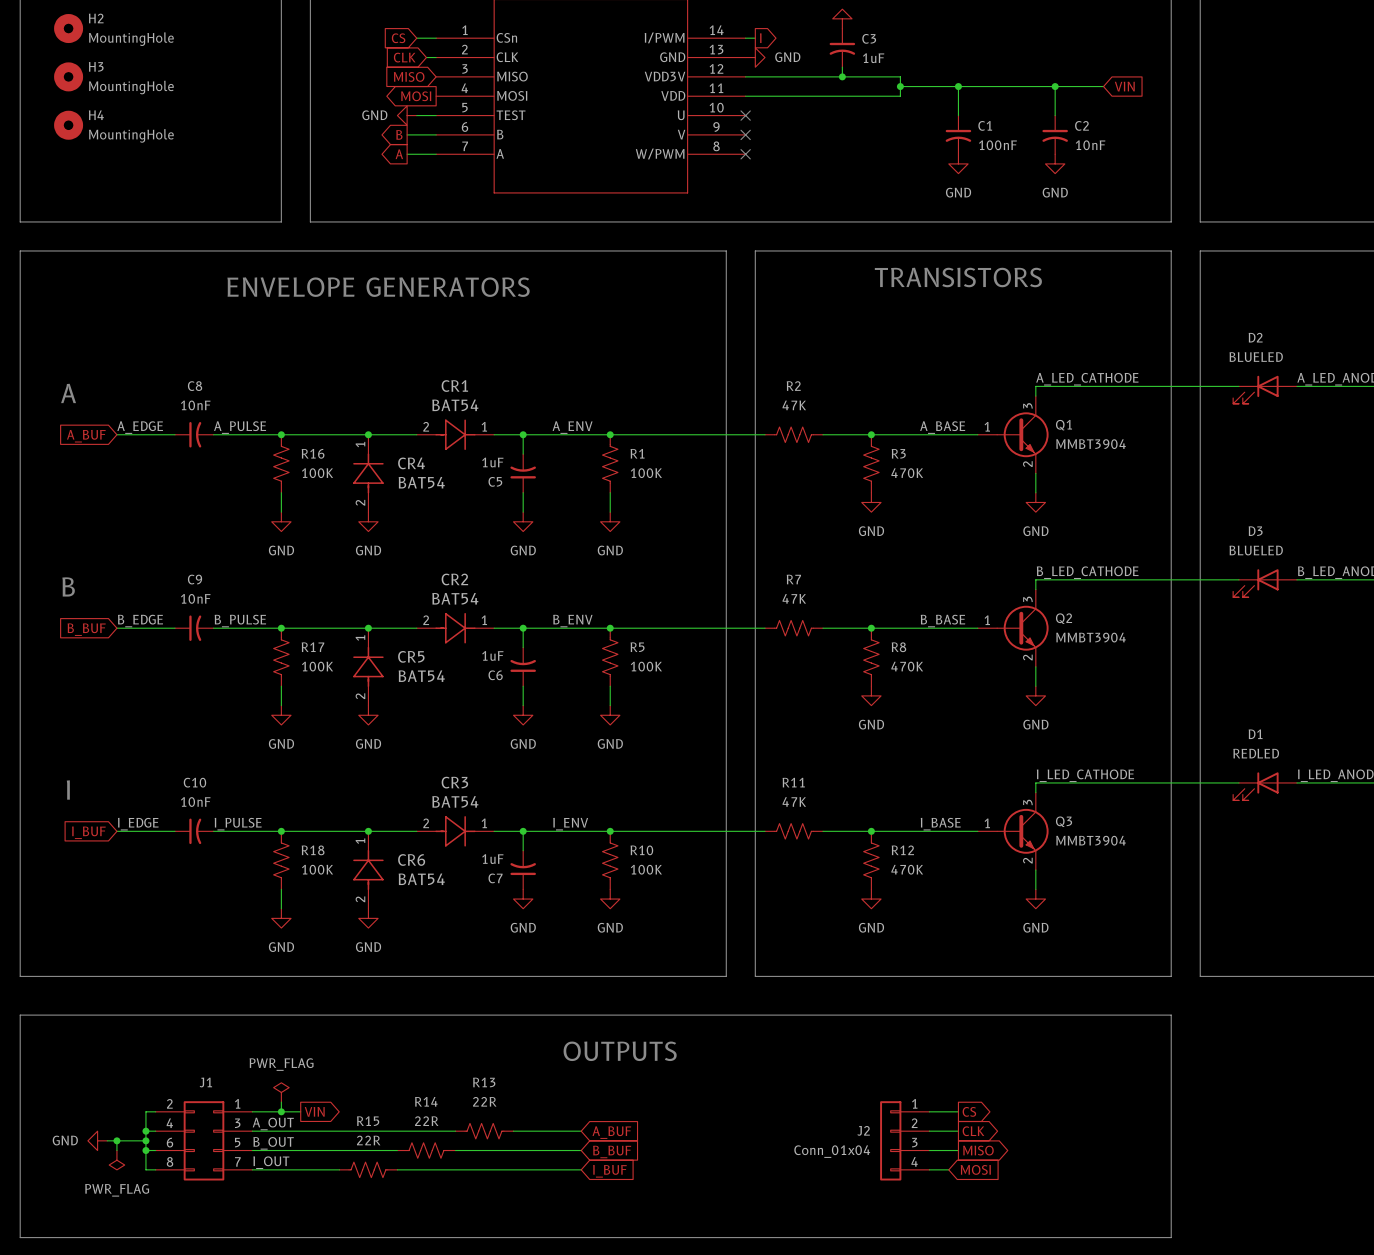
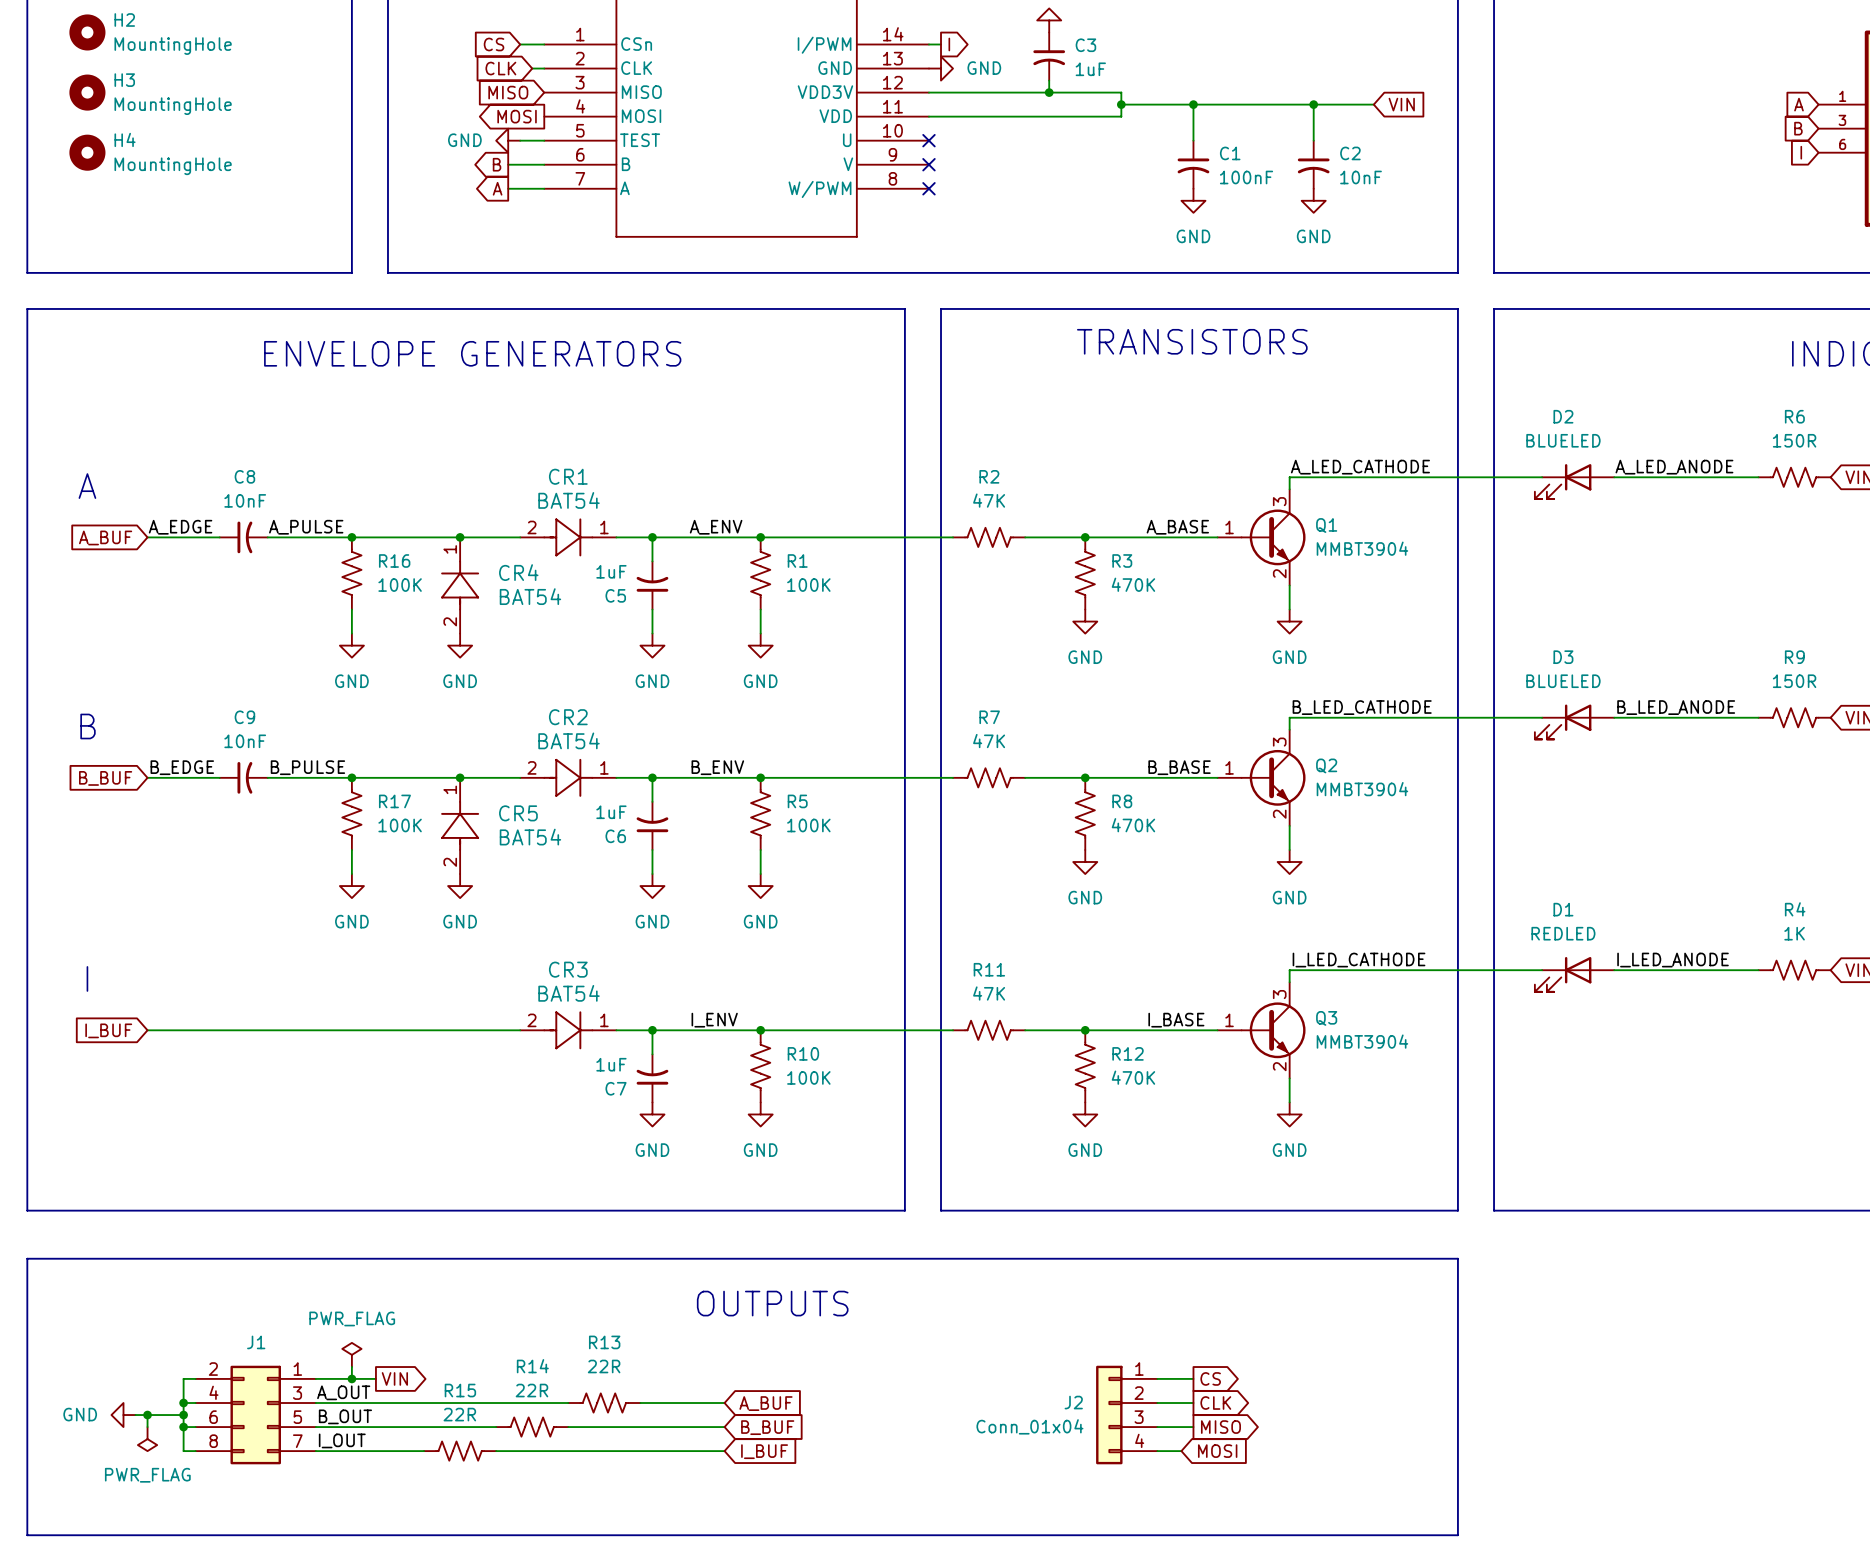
label: I_EDGE (138, 824) -> none
label: I_PULSE (238, 824) -> none
C10: 10nF (194, 831) -> none
junction: (281, 831) -> none
junction: (368, 831) -> none
R18: 100K (281, 860) -> none
CR6: BAT54 (368, 870) -> none
wire: (281, 889) (281, 908) -> none
power symbol: GND (281, 918) -> none
power symbol: GND (368, 918) -> none

